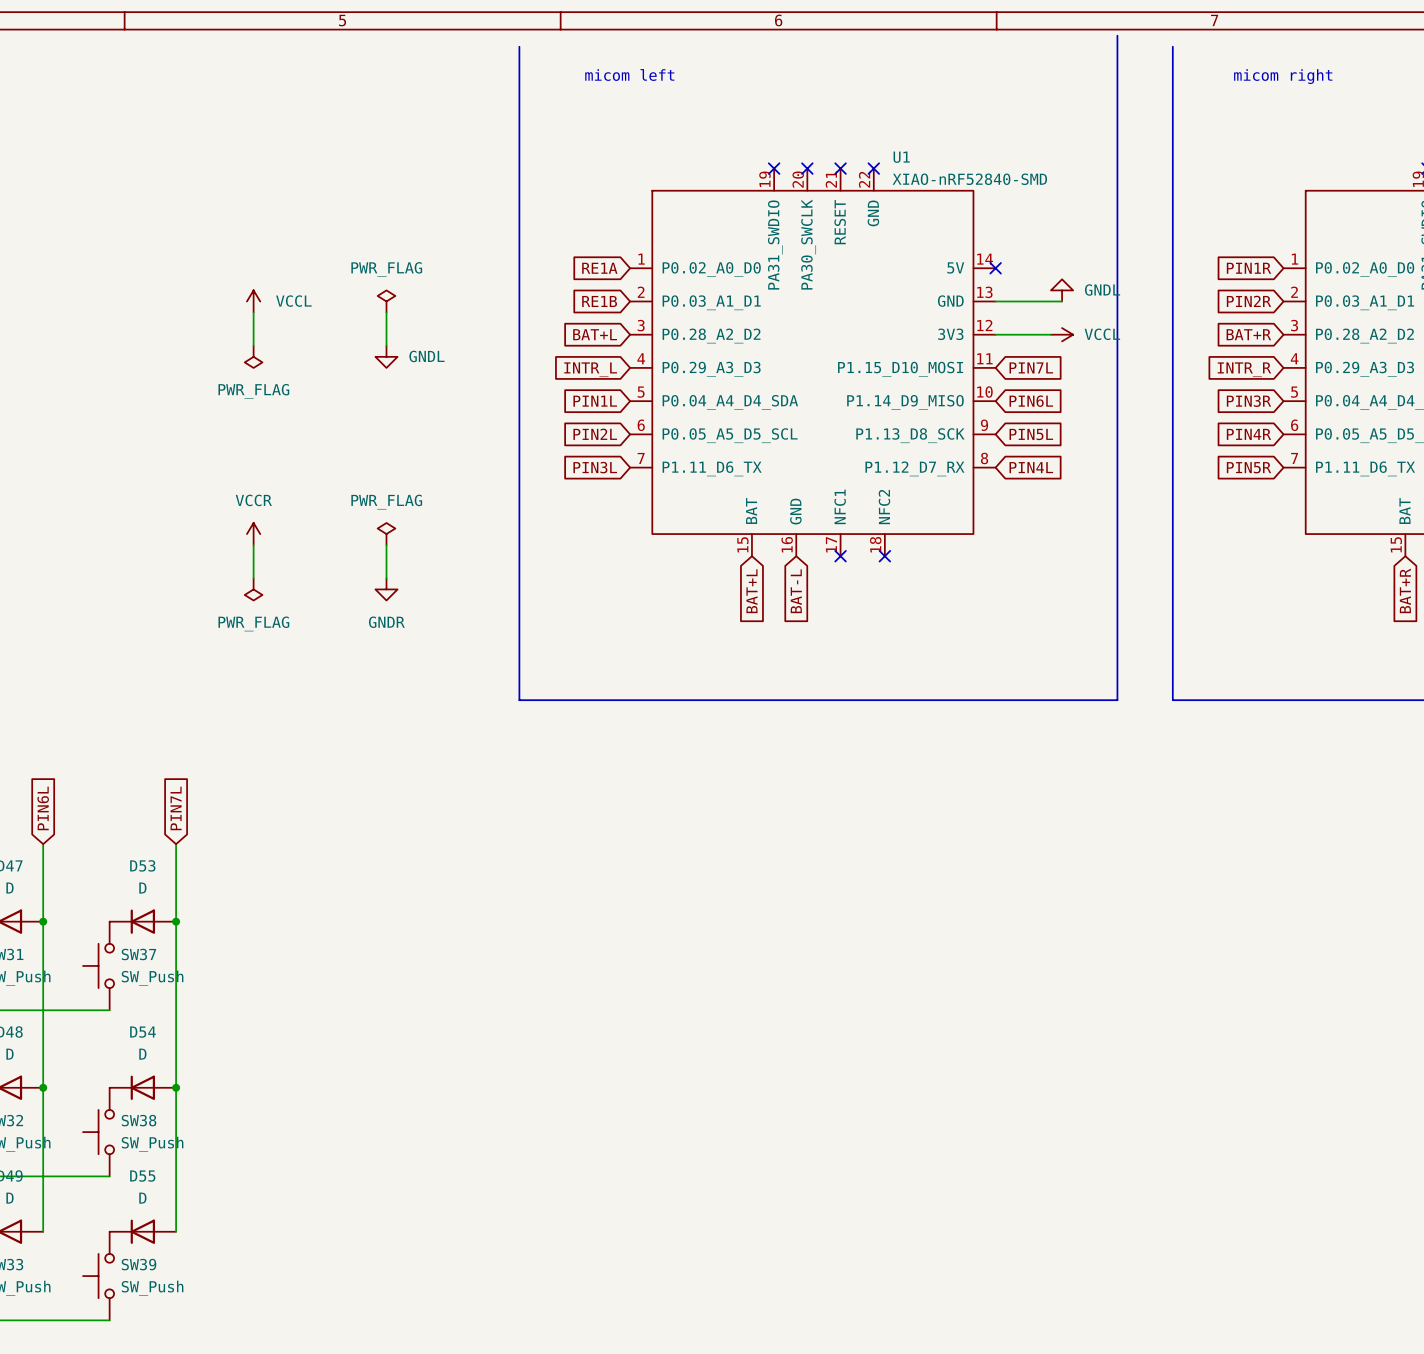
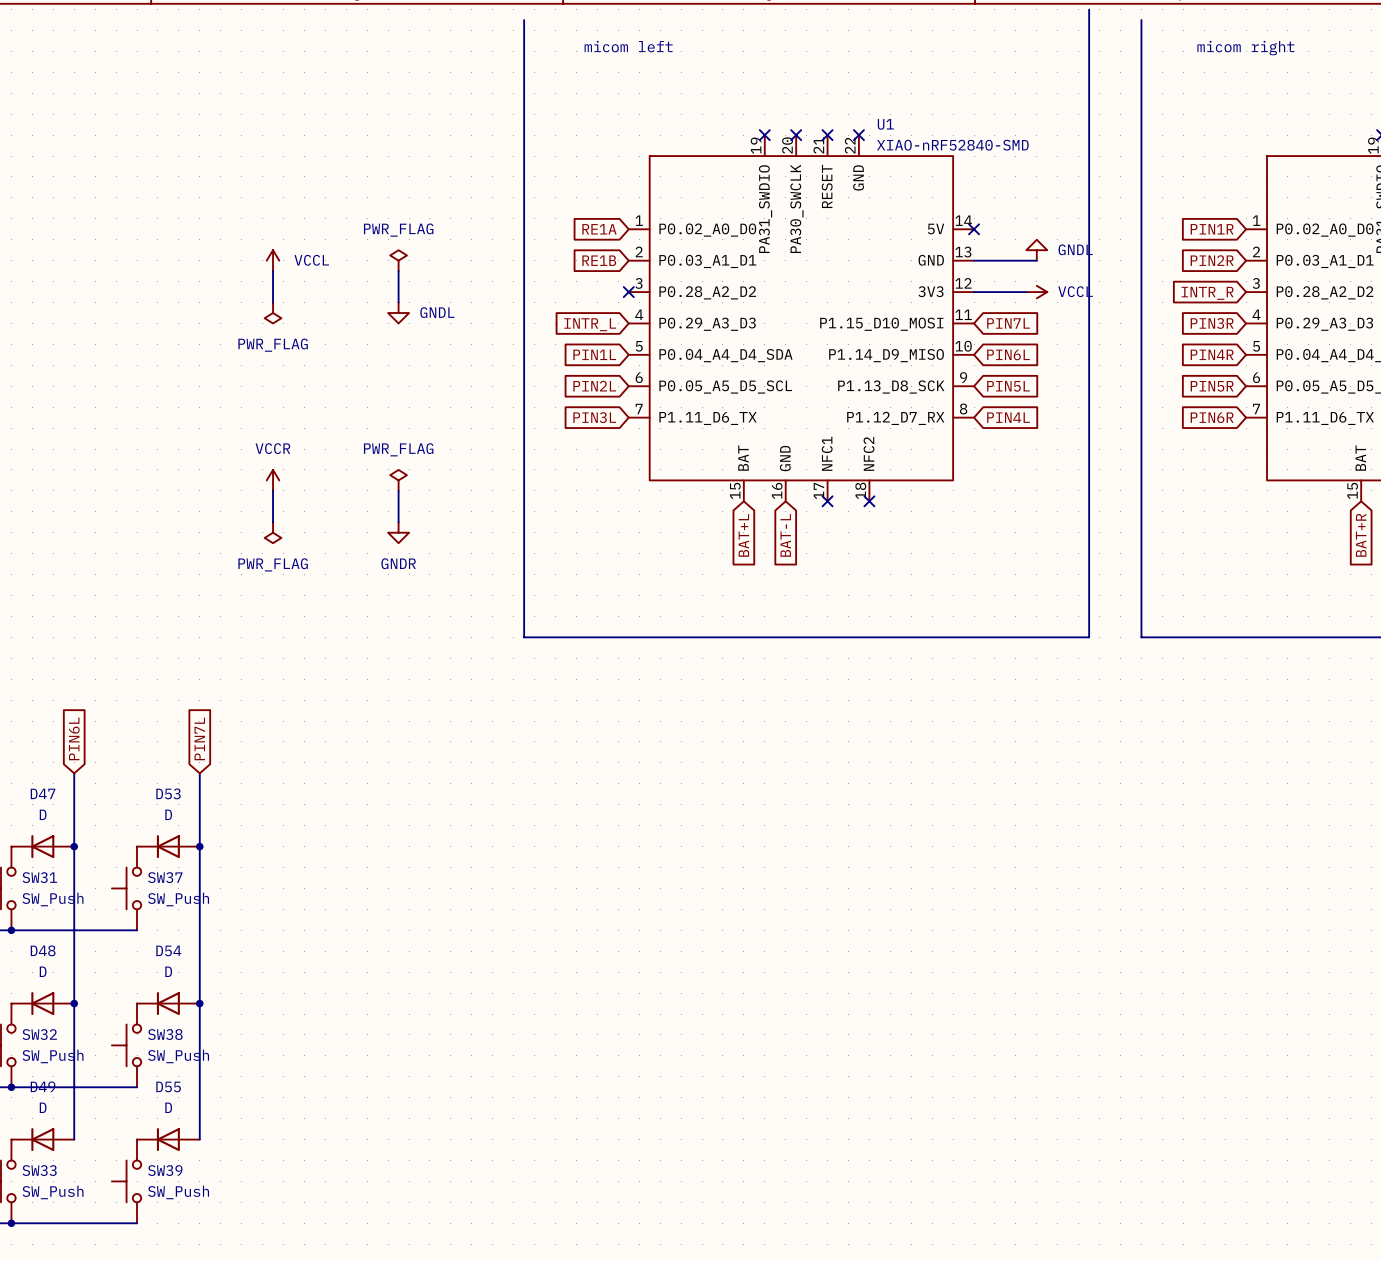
global label: BAT+L (595, 334) -> none
no-connect mark: none -> (628, 292)
global label: BAT+R (1248, 334) -> INTR_R (1207, 293)
global label: INTR_R (1244, 369) -> PIN3R (1212, 323)
global label: PIN3R (1248, 401) -> PIN4R (1212, 354)
global label: PIN4R (1248, 434) -> PIN5R (1212, 386)
global label: PIN5R (1248, 467) -> PIN6R (1212, 417)

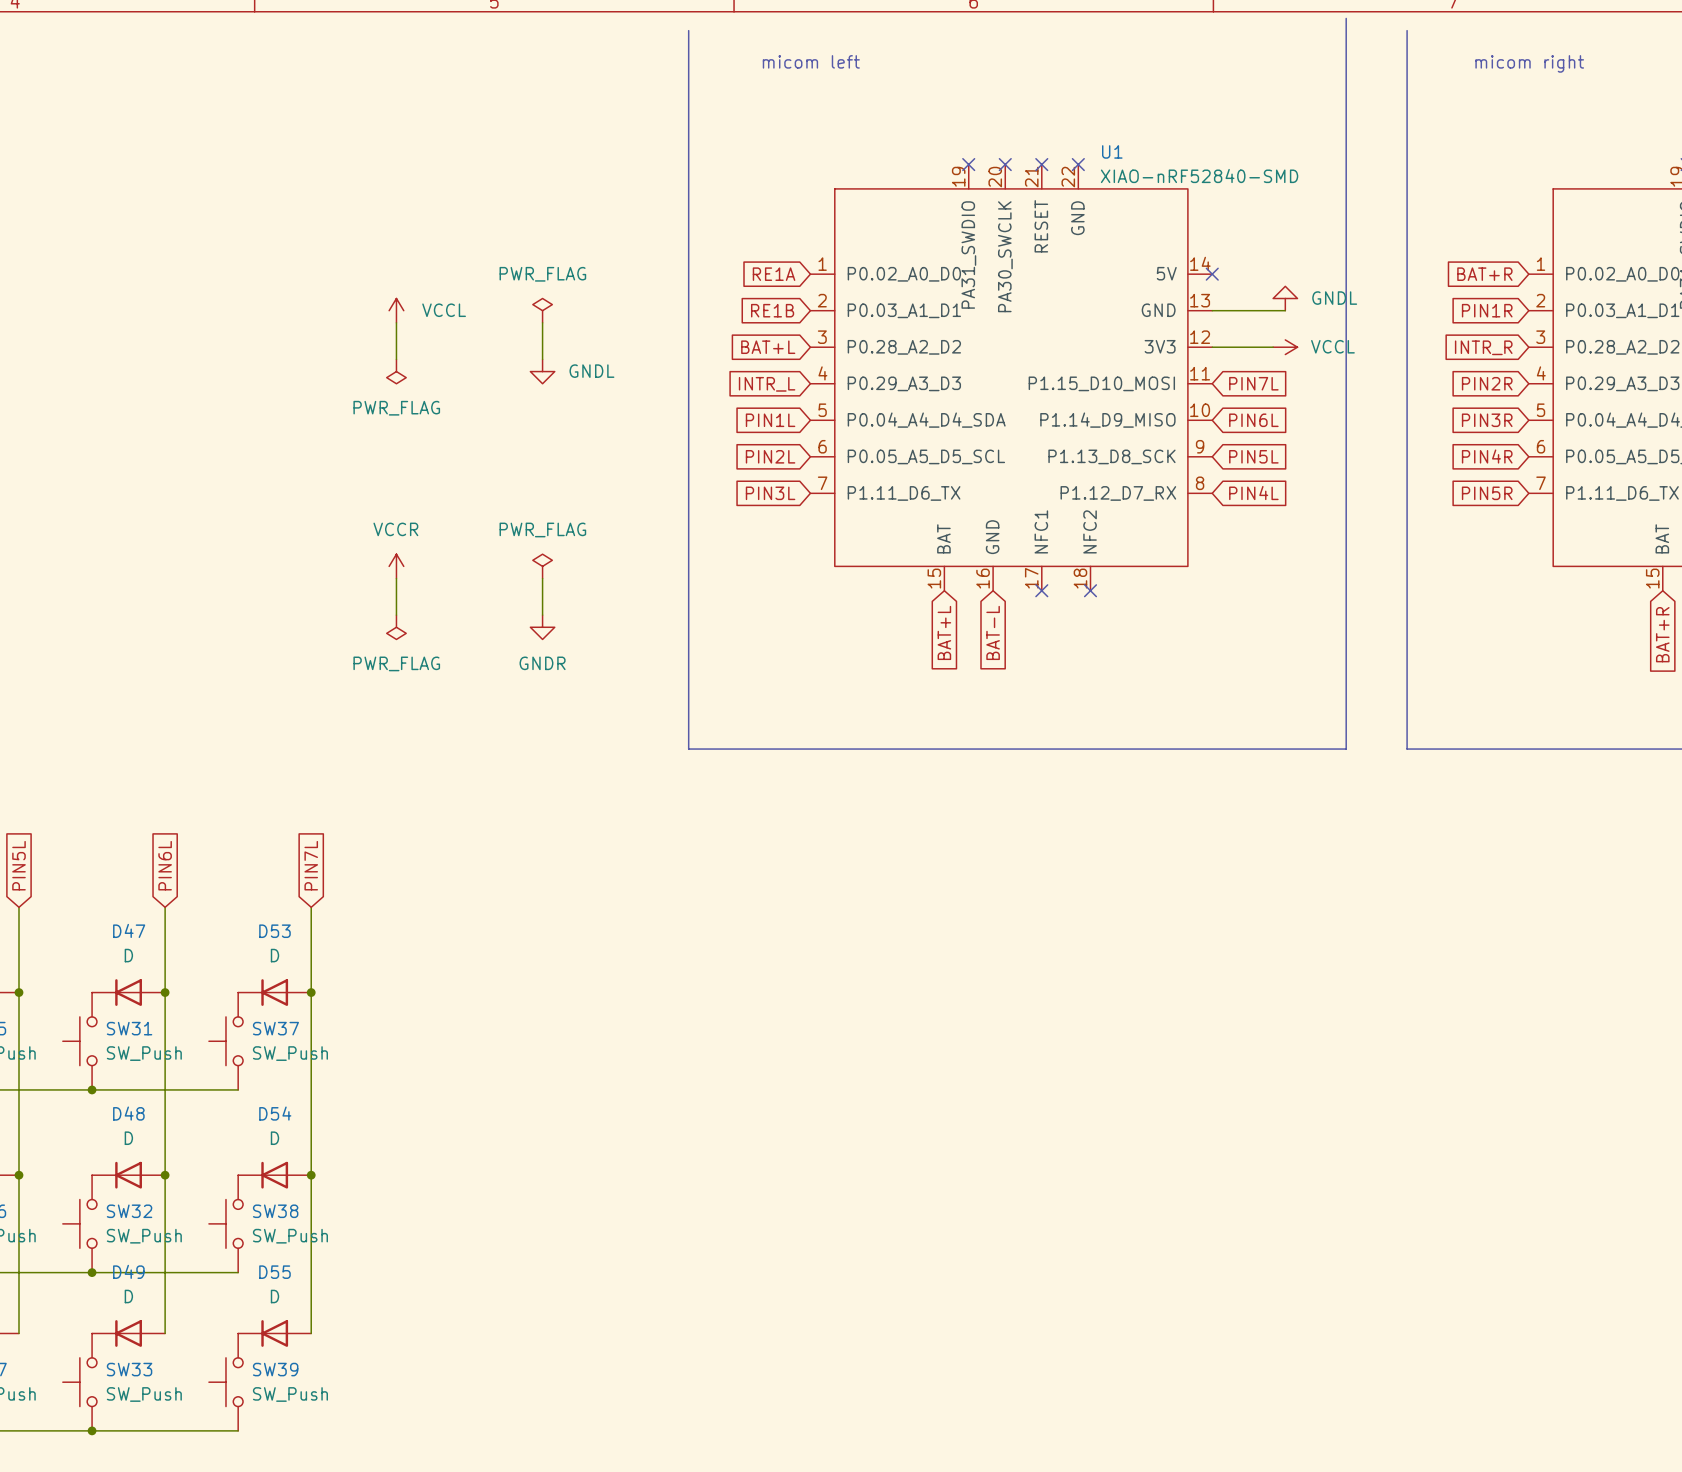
global label: PIN1R (1212, 229) -> BAT+R (1484, 274)
global label: PIN2R (1212, 260) -> PIN1R (1487, 310)
global label: none -> BAT+L (768, 347)
no-connect mark: (628, 292) -> none
global label: PIN3R (1212, 323) -> PIN2R (1487, 383)
global label: PIN4R (1212, 354) -> PIN3R (1487, 420)
global label: PIN5R (1212, 386) -> PIN4R (1487, 456)
global label: PIN6R (1212, 417) -> PIN5R (1487, 493)

